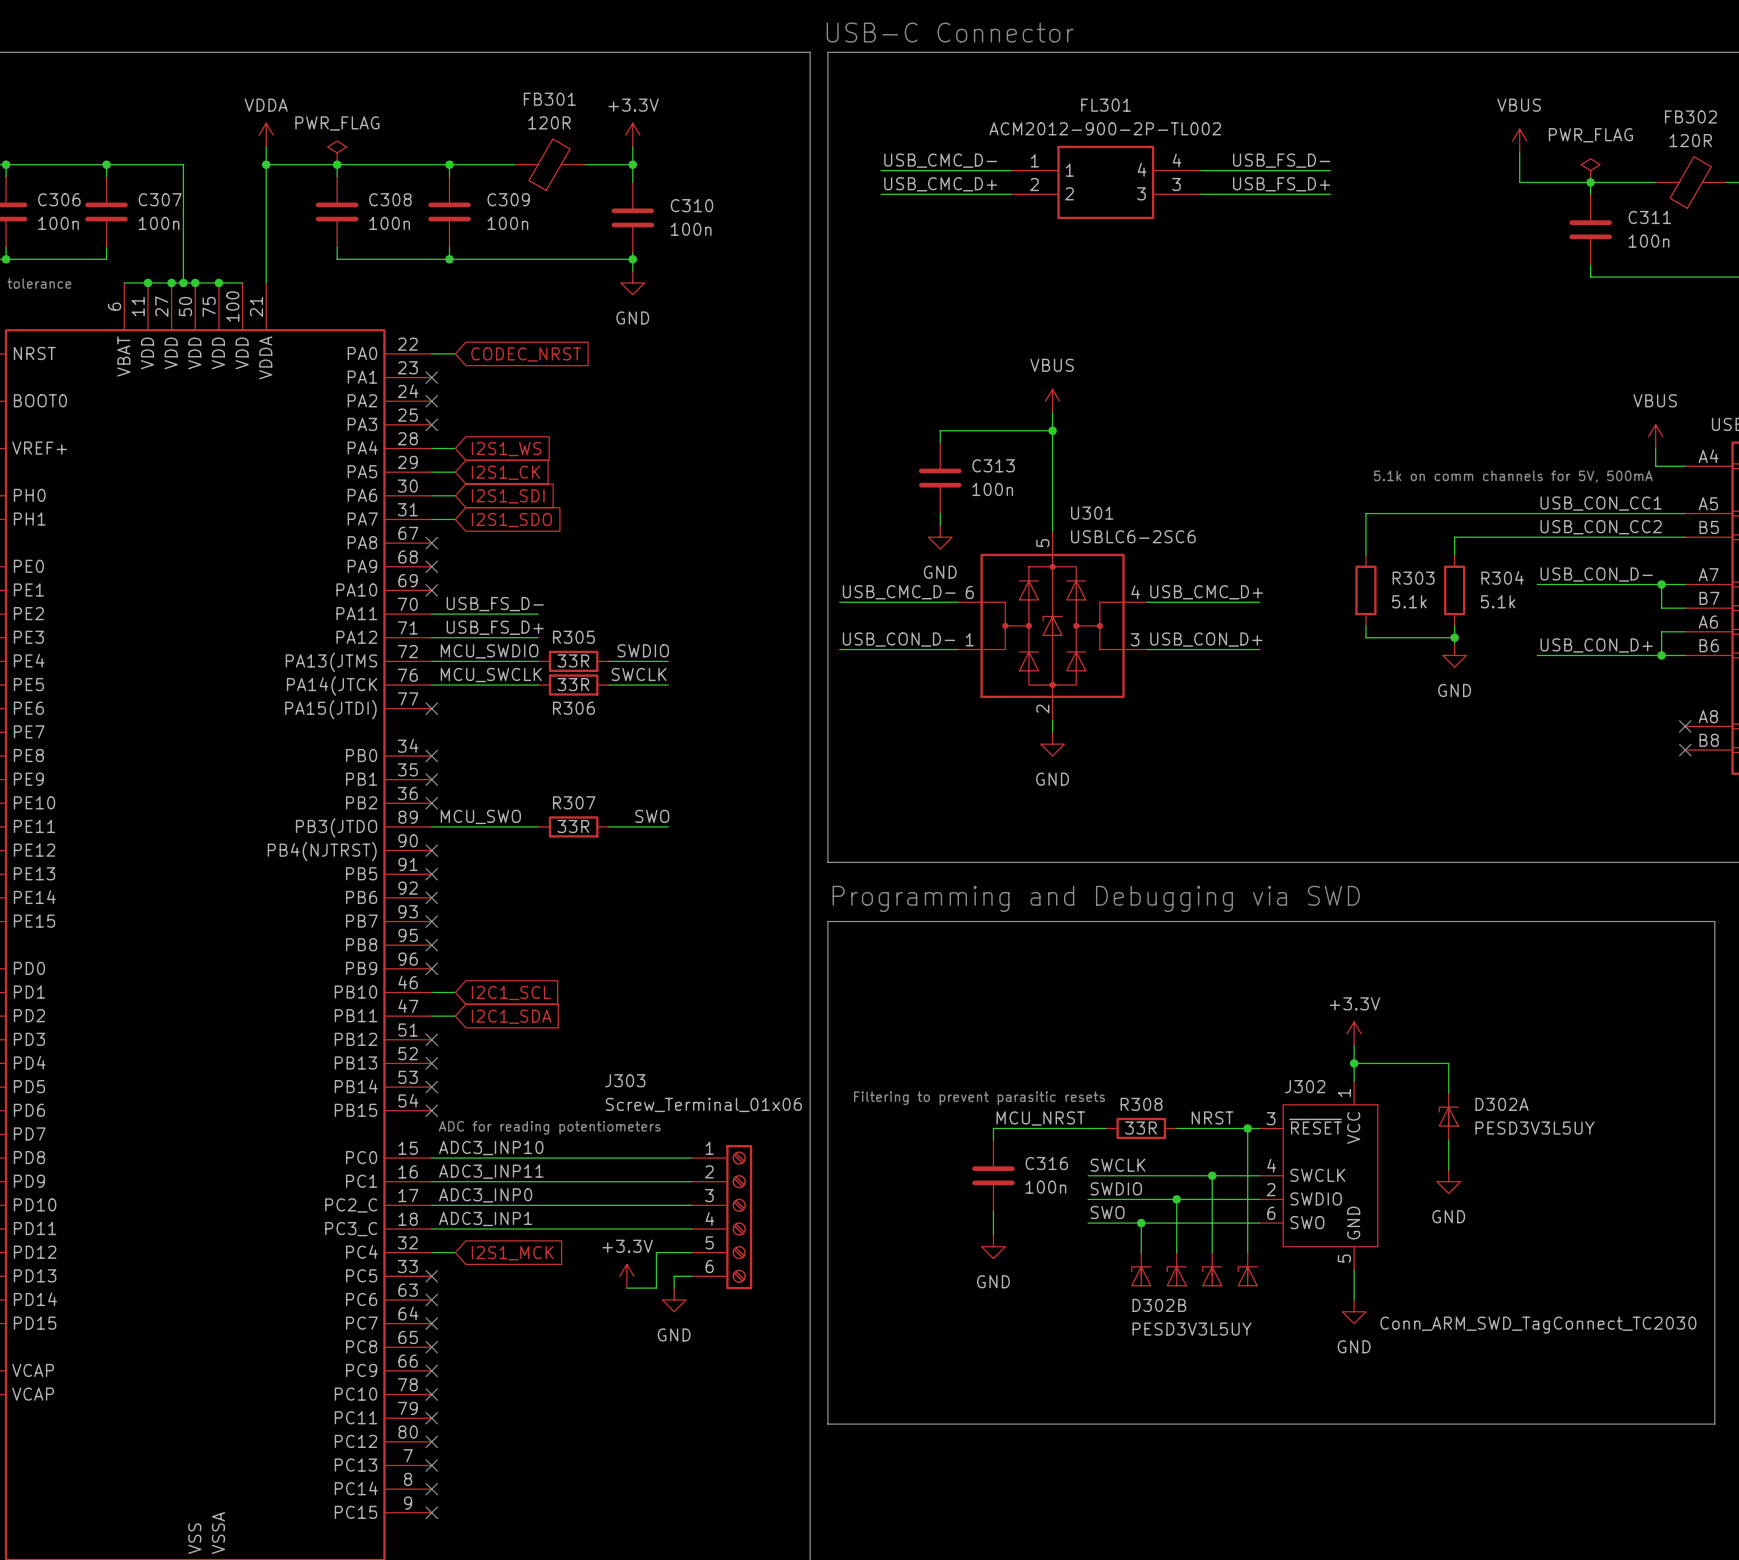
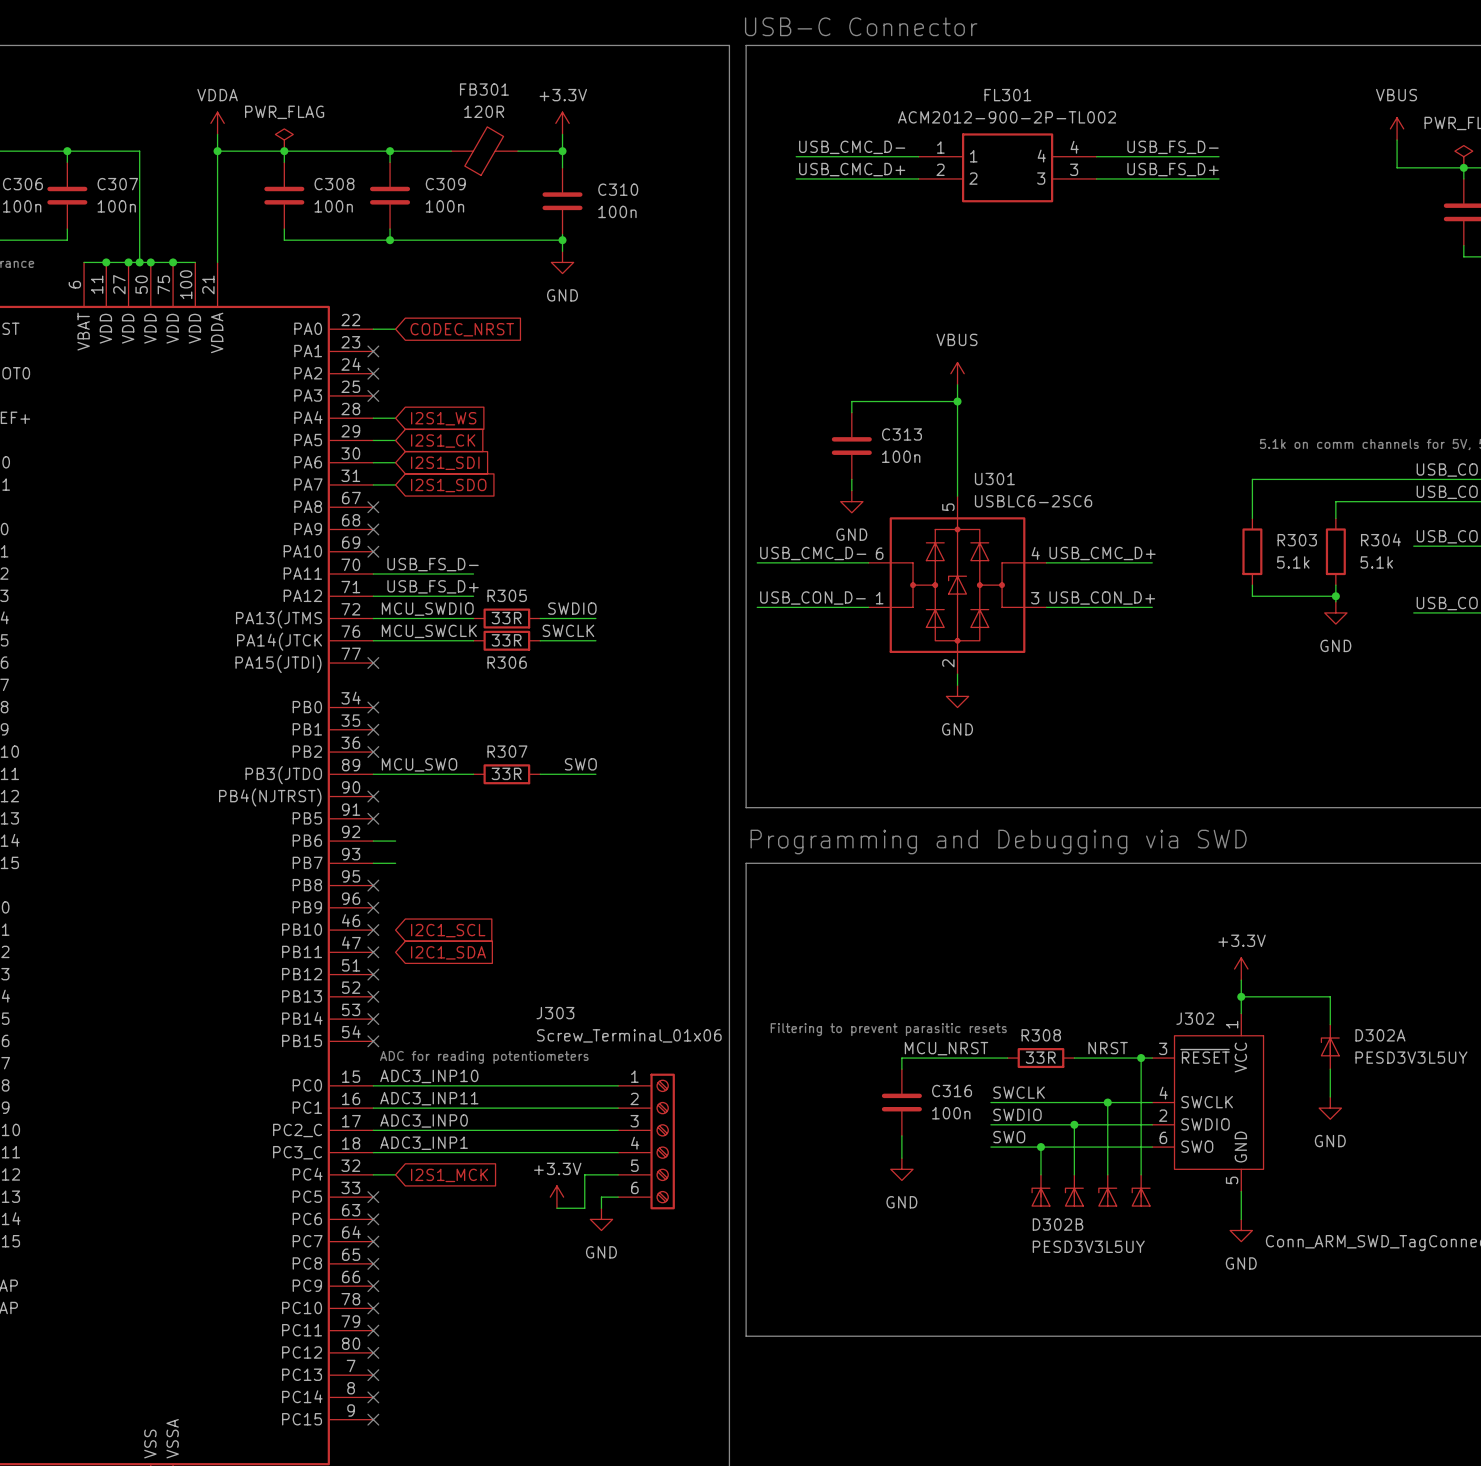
no-connect mark: (431, 897) -> none
no-connect mark: (431, 921) -> none
wire: (431, 992) (455, 992) -> (373, 841) (395, 841)
no-connect mark: none -> (373, 930)
wire: (431, 1016) (455, 1016) -> (373, 863) (395, 863)
no-connect mark: none -> (373, 952)

